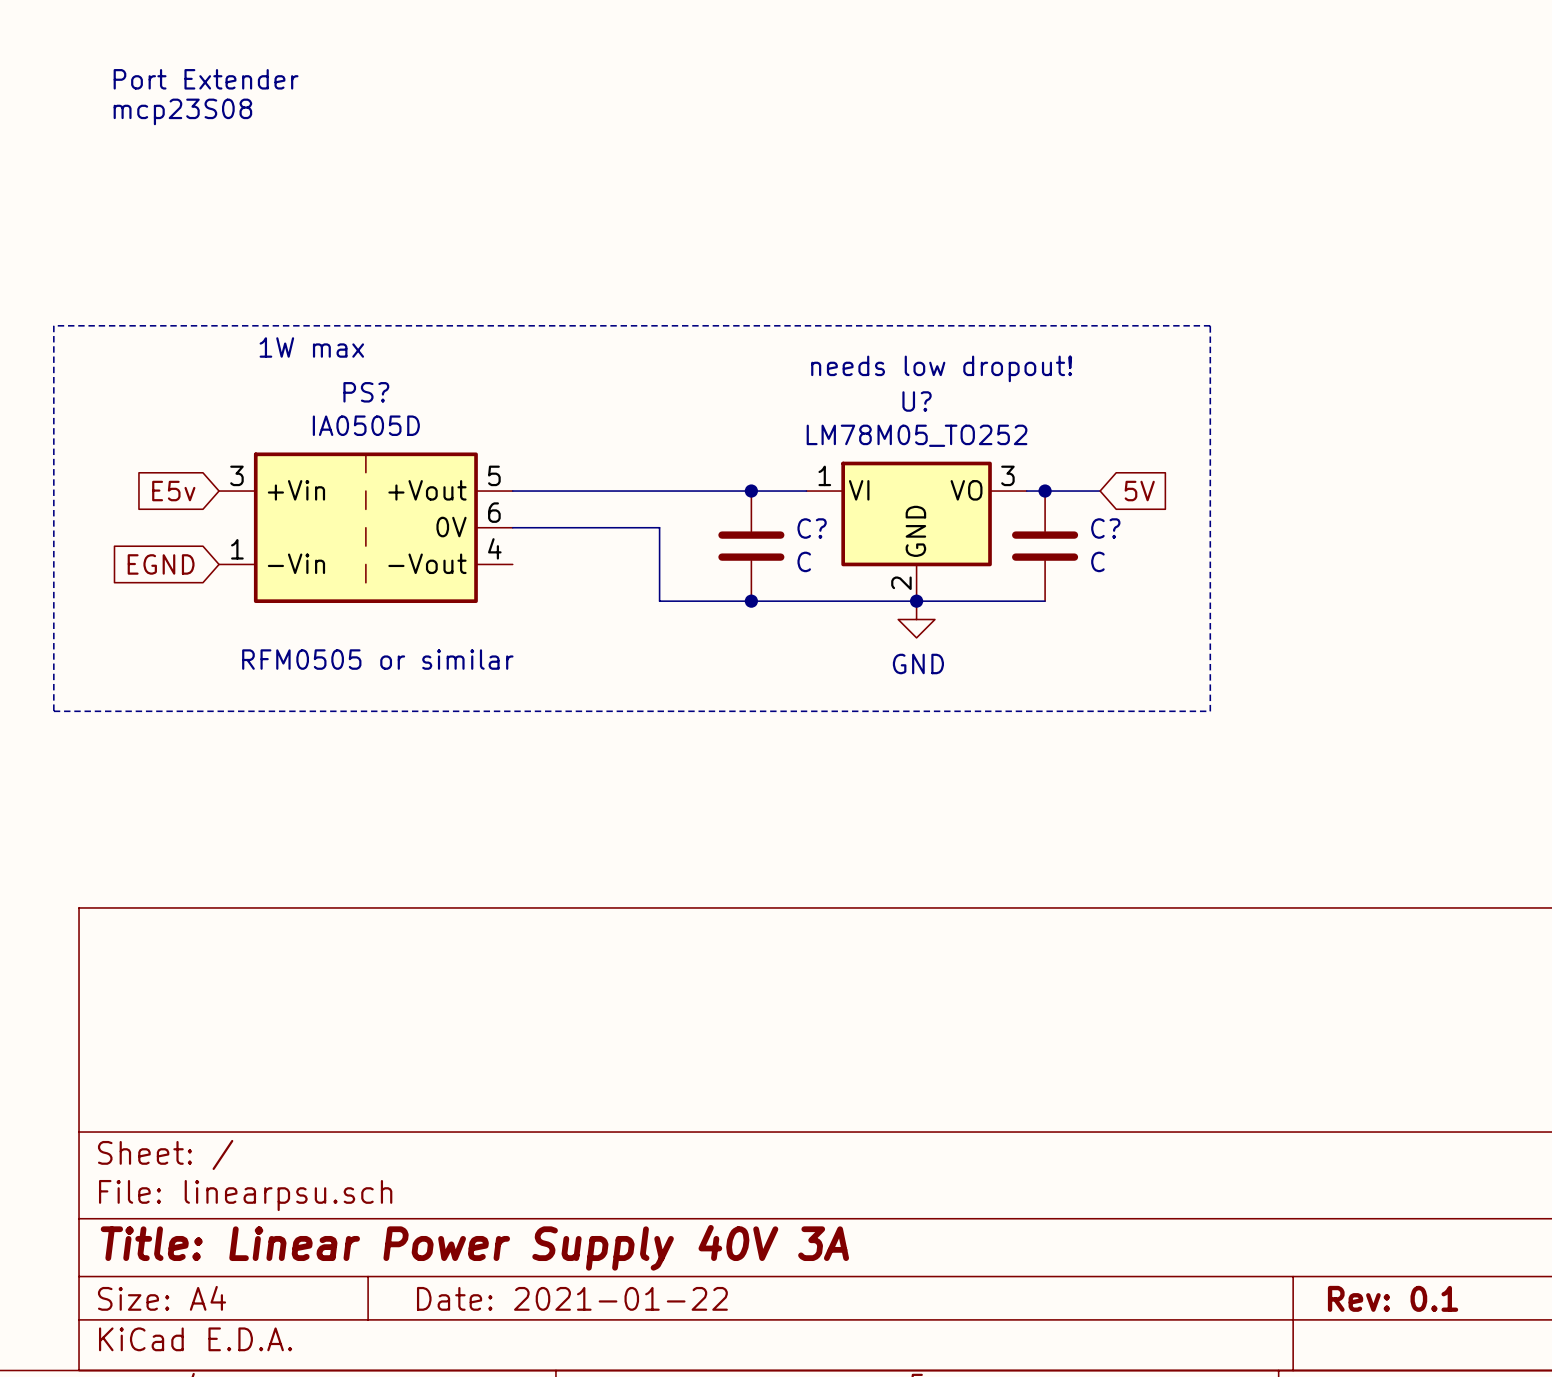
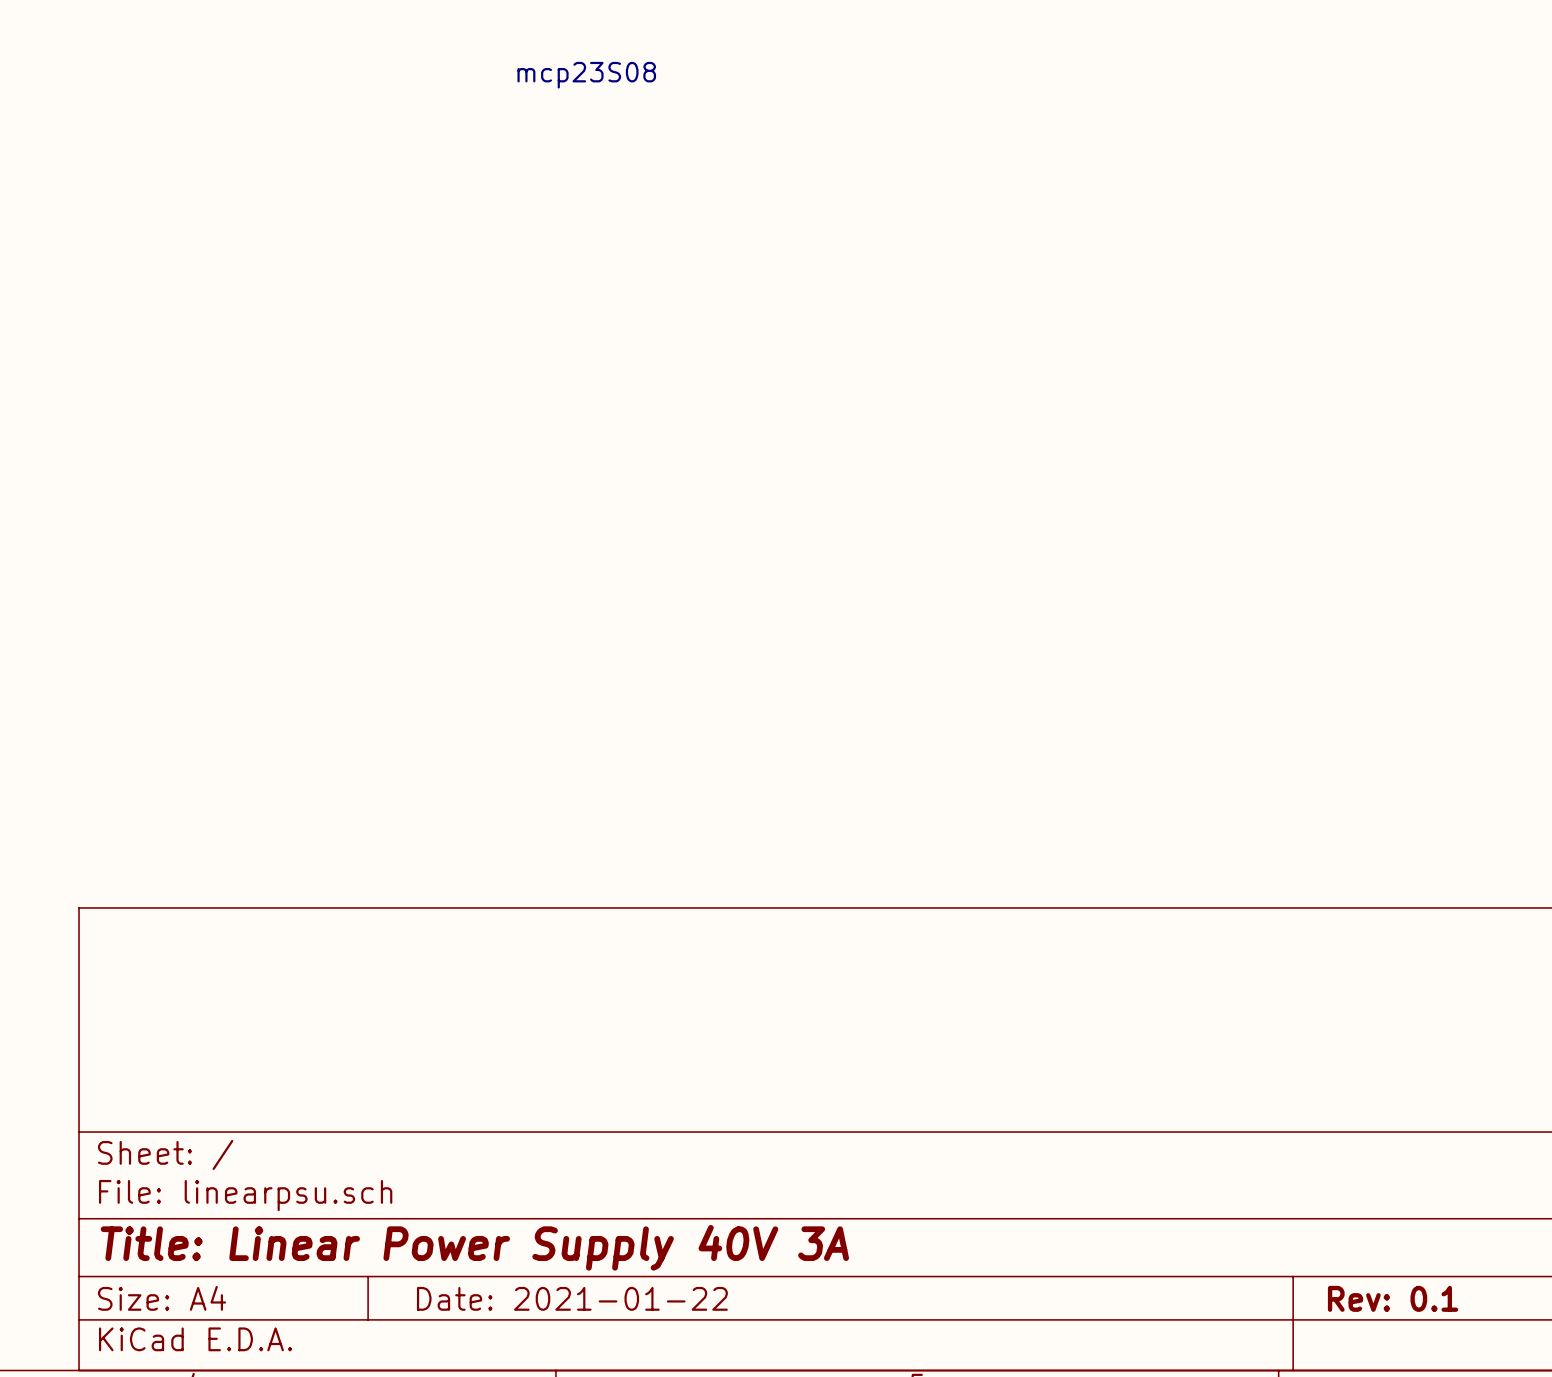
text: none -> mcp23S08 (586, 75)
text: Port Extender (206, 79) -> none
text: mcp23S08 (182, 111) -> none
line: (53, 325) (1210, 325) (1210, 711) (53, 711) (53, 325) -> none
text: 1W max (311, 347) -> none
text: needs low dropout! (941, 368) -> none
global label: E5v (173, 491) -> none
wire: (512, 491) (806, 491) -> none
junction: (751, 491) -> none
wire: (1026, 491) (1100, 491) -> none
junction: (1045, 491) -> none
global label: 5V (1139, 491) -> none
PS?: IA0505D (365, 527) -> none
wire: (512, 527) (659, 527) (659, 601) (1045, 601) -> none
U?: LM78M05_TO252 (916, 531) -> none
C?: C (751, 546) -> none
C?: C (1045, 546) -> none
global label: EGND (161, 564) -> none
junction: (751, 601) -> none
junction: (916, 601) -> none
power symbol: GND (916, 619) -> none
text: RFM0505 or similar (377, 659) -> none

